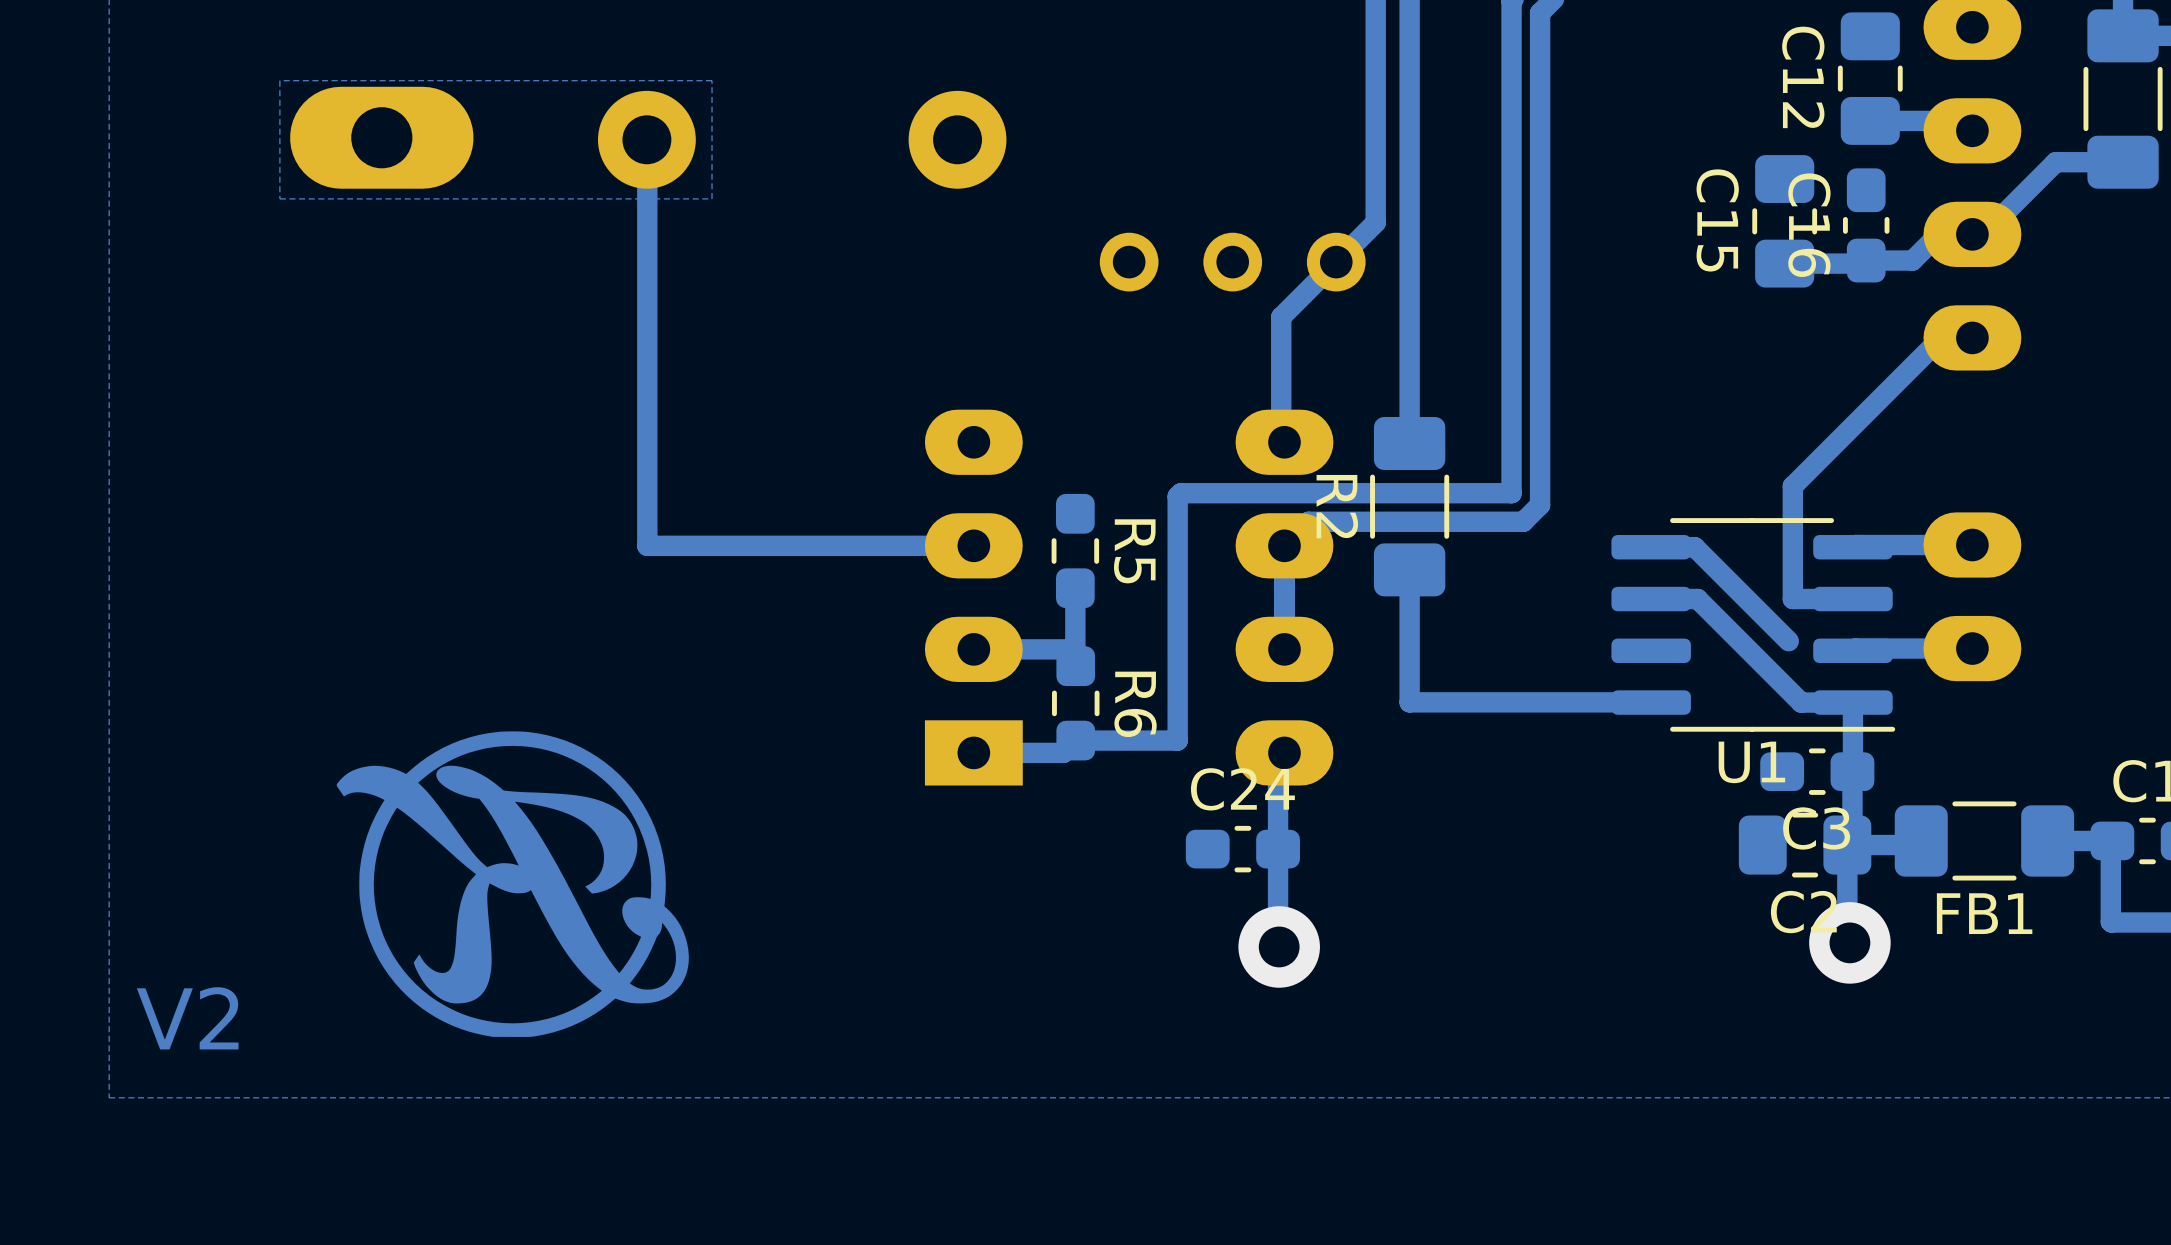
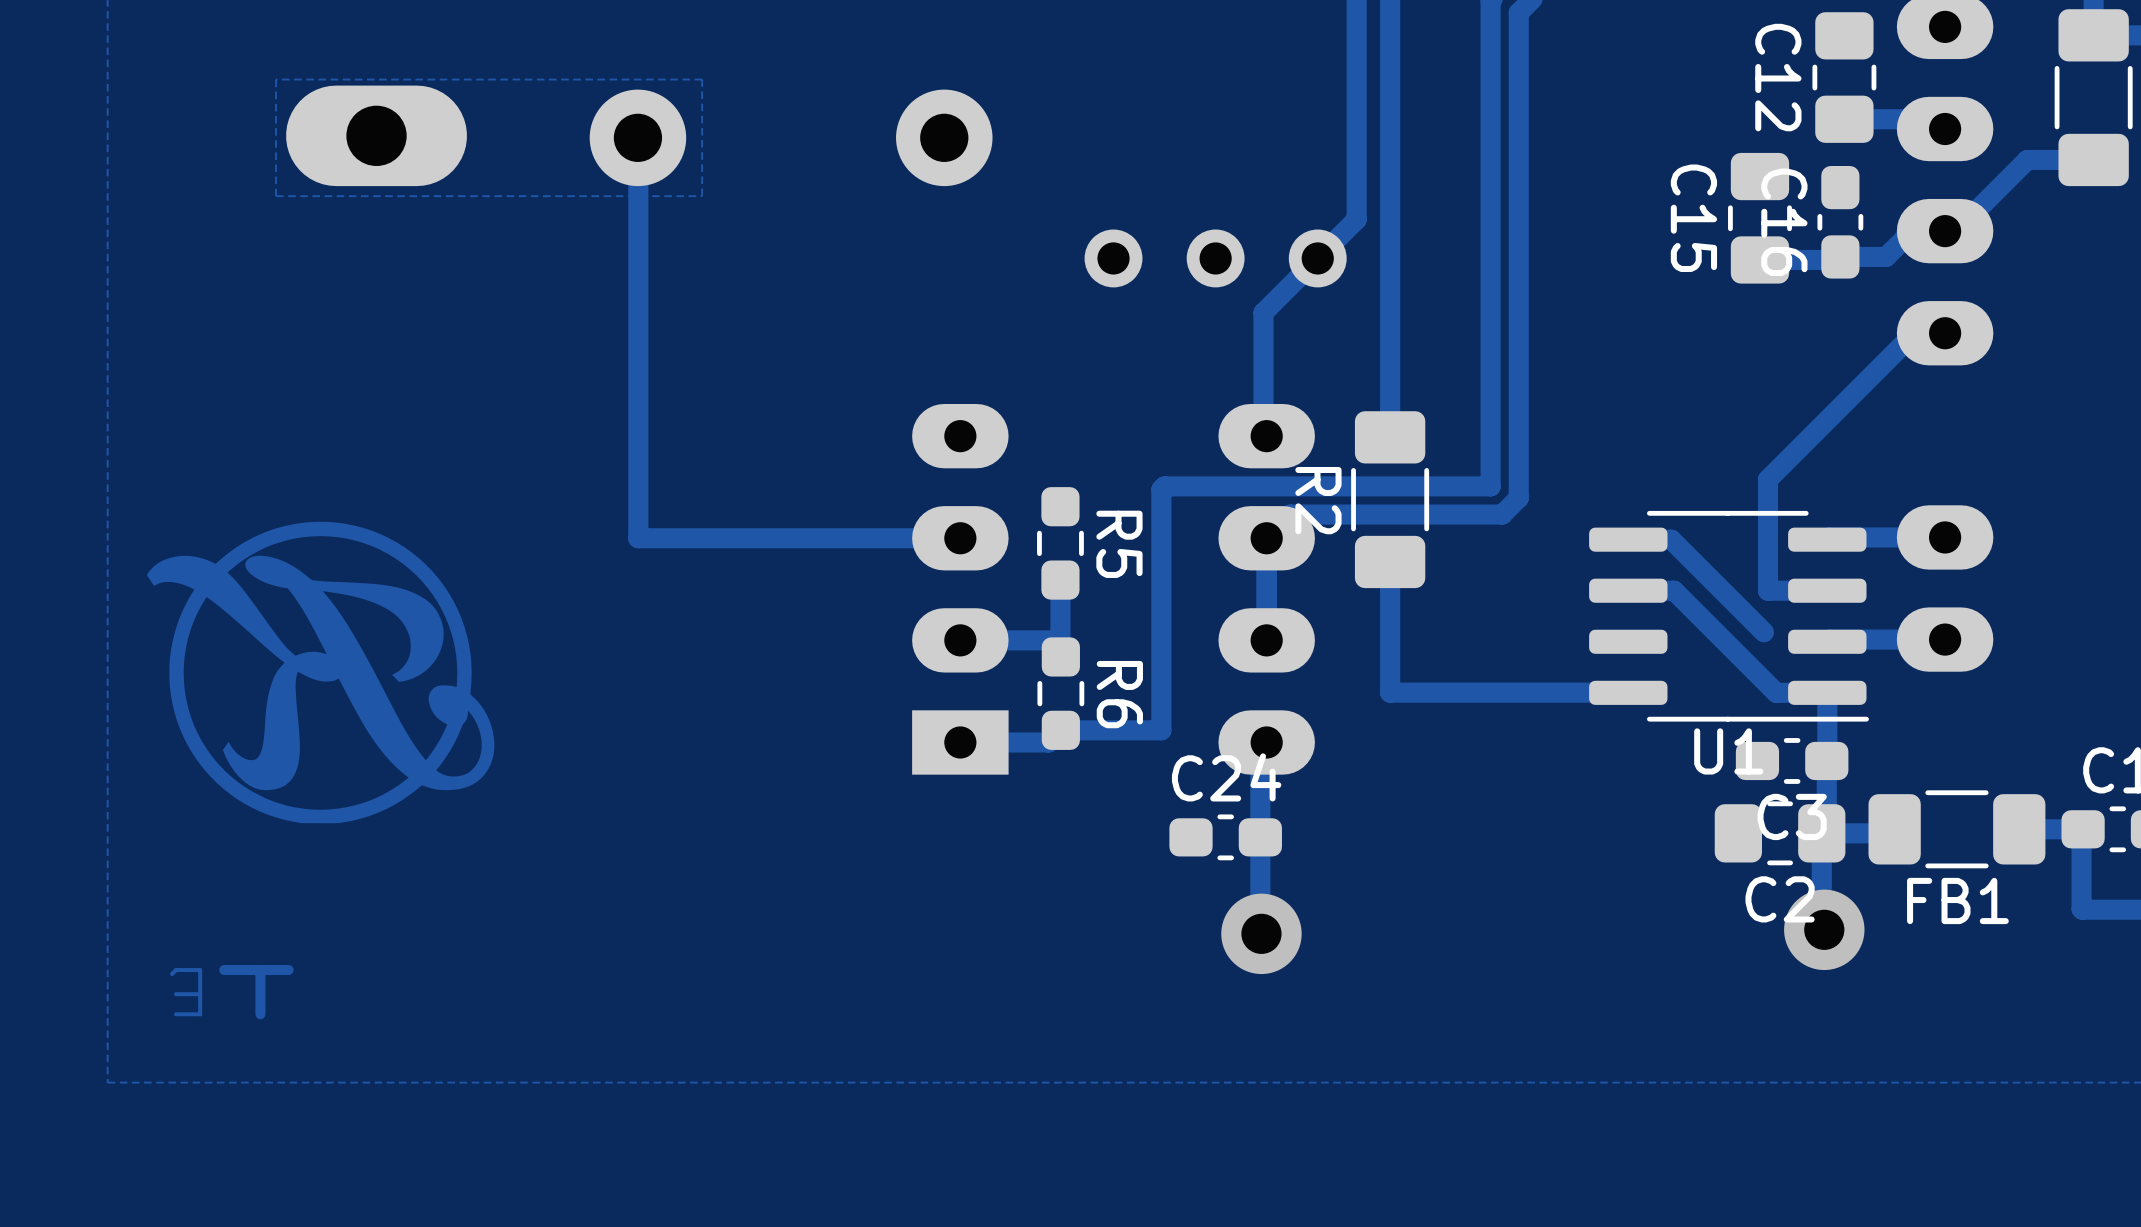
drawing position: (512, 884) -> (320, 672)
track: none -> (260, 970) (260, 1014)
track: none -> (288, 970) (224, 970)
track: none -> (171, 974) (176, 970) (200, 970) (200, 1014) (176, 1014)
track: none -> (200, 994) (176, 994)
text: V2 (187, 1018) -> none

